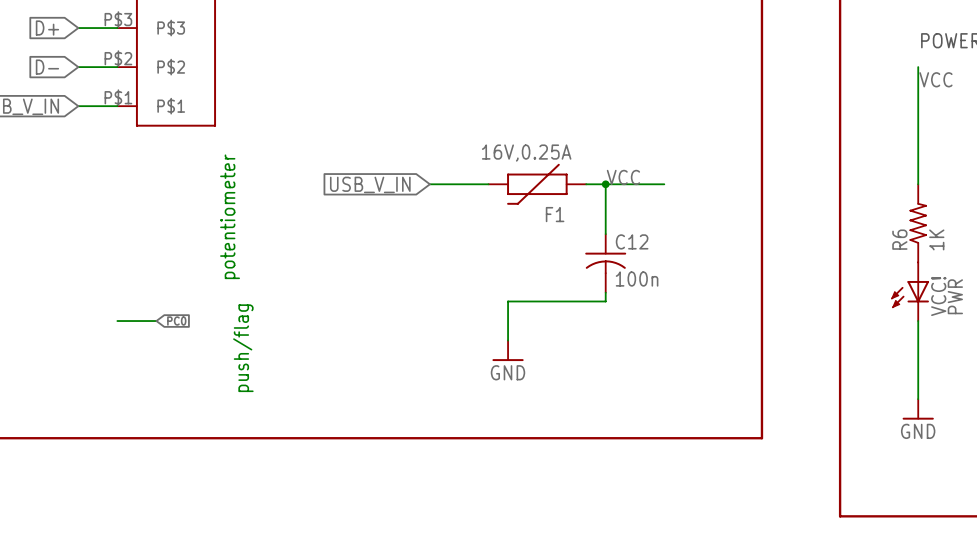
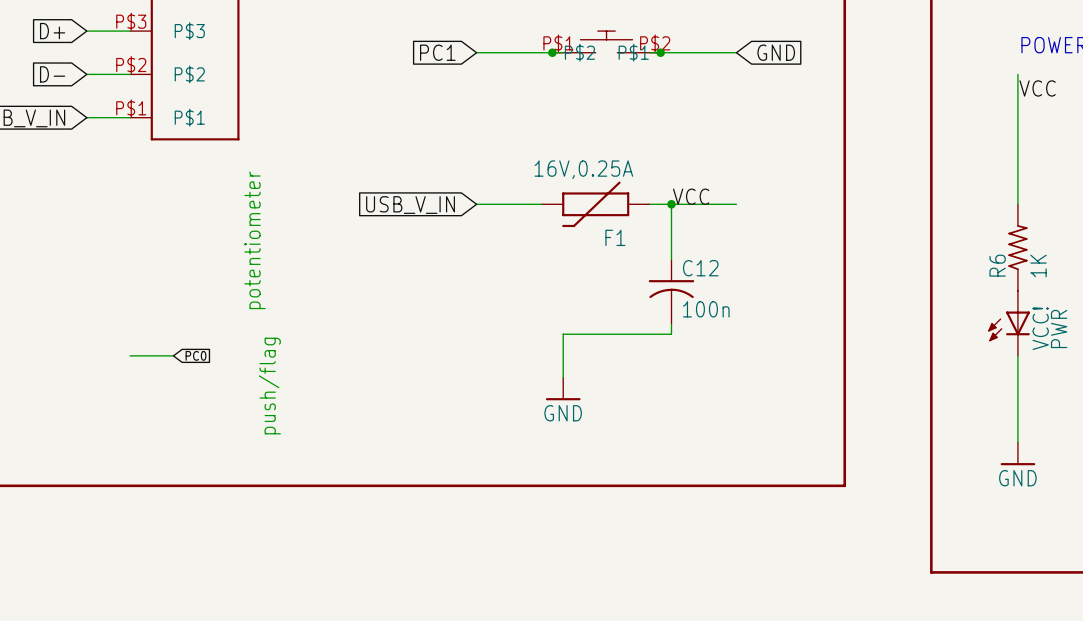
part: none -> (606, 41)
global label: none -> PC1 (437, 52)
wire: none -> (476, 52) (563, 52)
junction: none -> (552, 52)
wire: none -> (649, 52) (736, 52)
junction: none -> (660, 52)
global label: none -> GND (776, 52)

